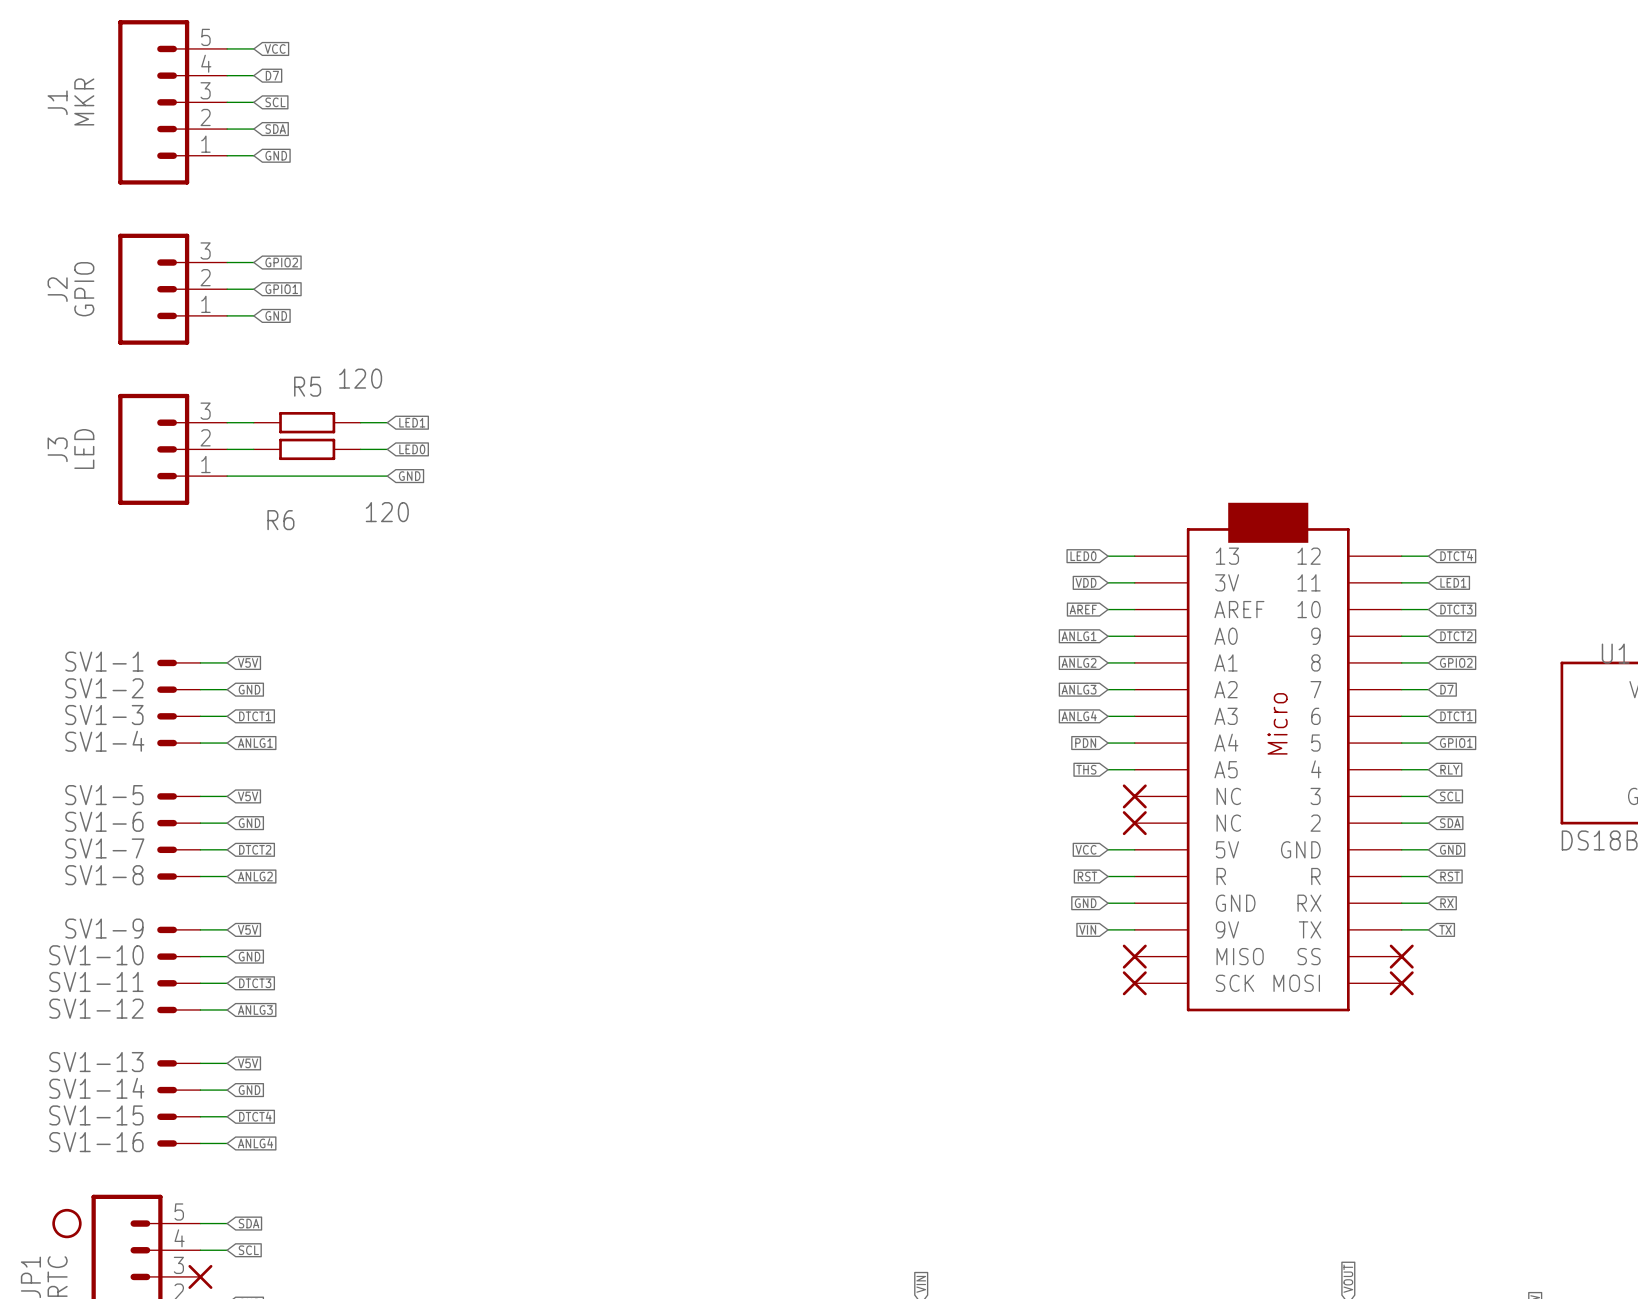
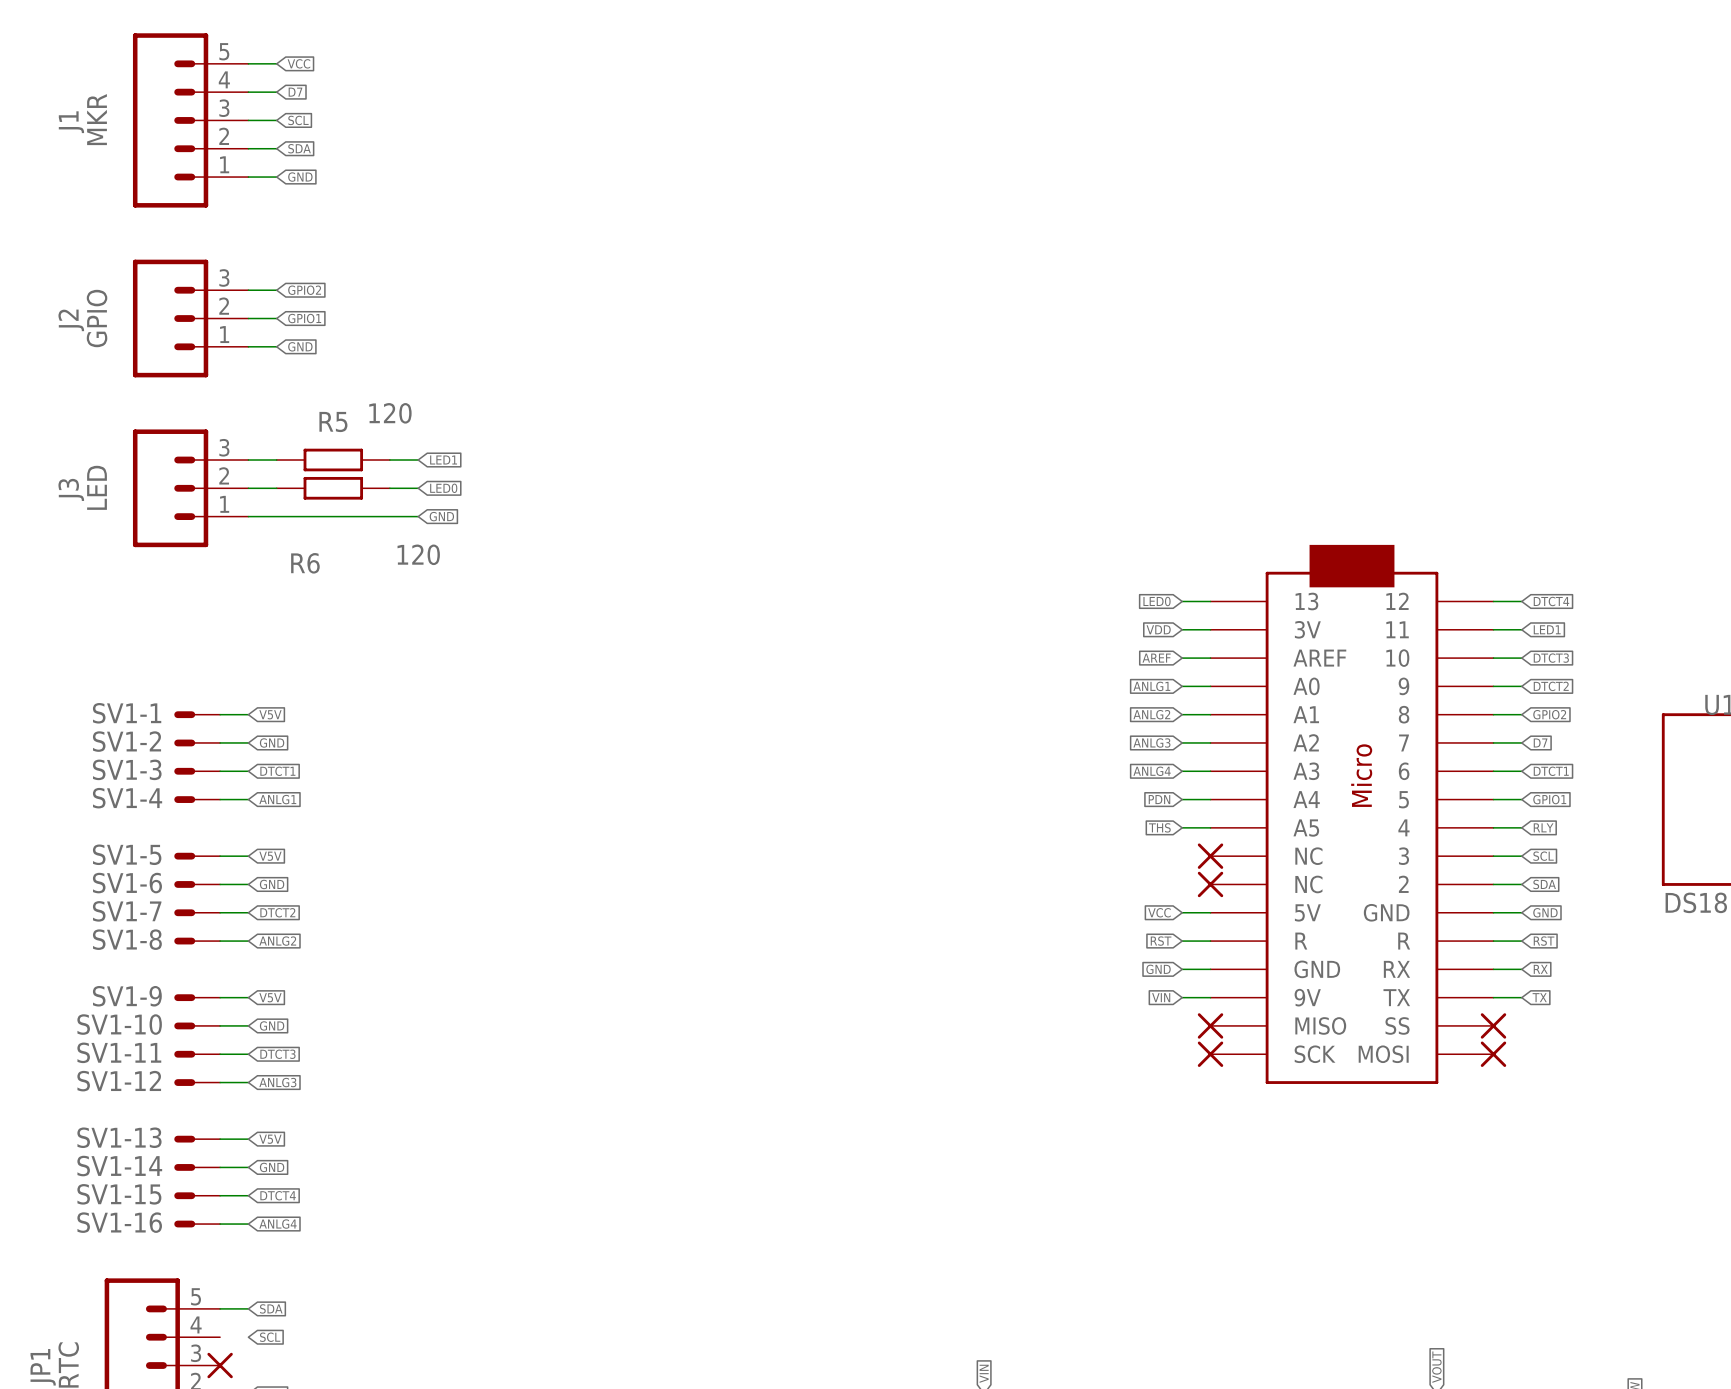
part: (66, 1223) -> none
wire: (200, 1250) (227, 1250) -> none

